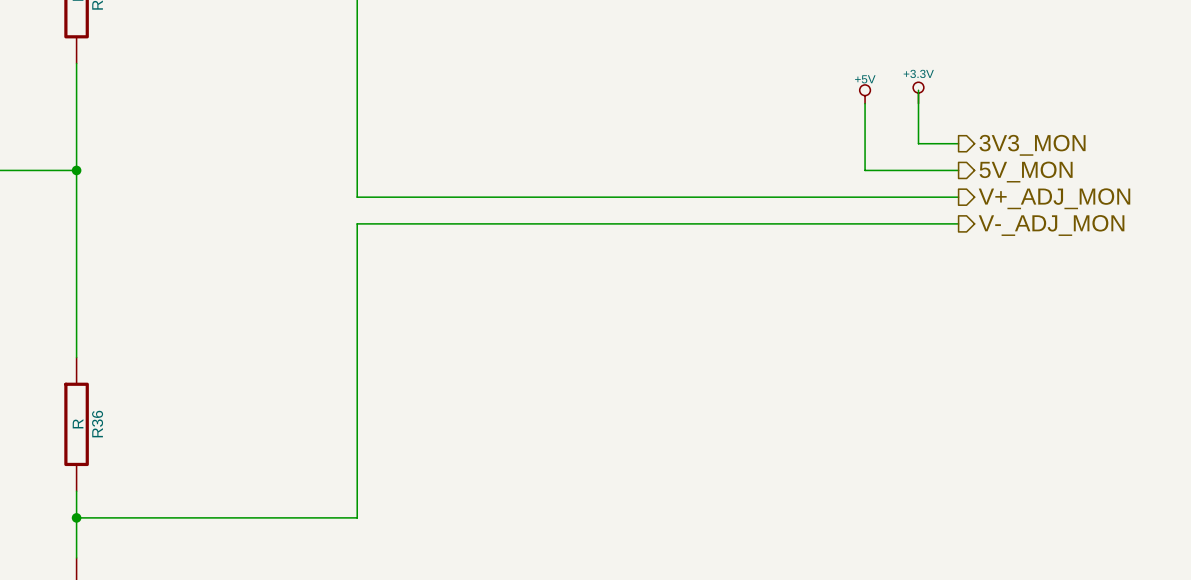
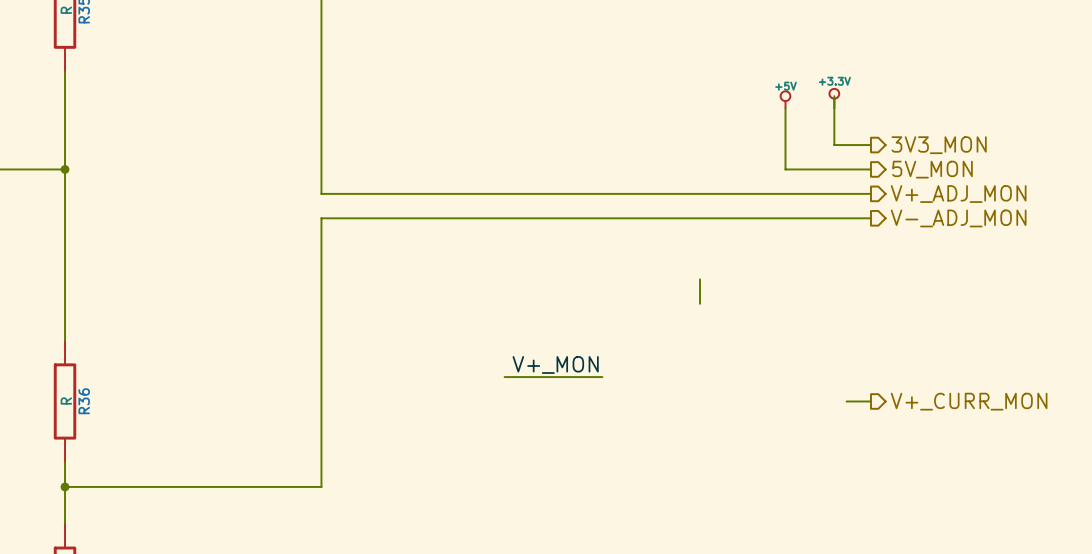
wire: none -> (700, 279) (700, 303)
label: none -> V+_MON (555, 364)
wire: none -> (504, 377) (602, 377)
wire: none -> (846, 401) (870, 401)
hierarchical label: none -> V+_CURR_MON (969, 401)

